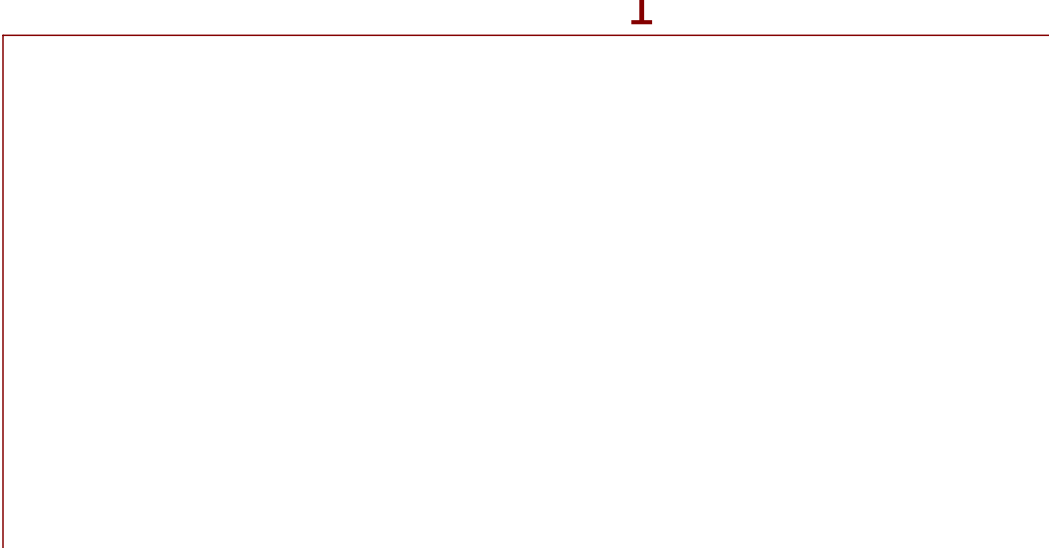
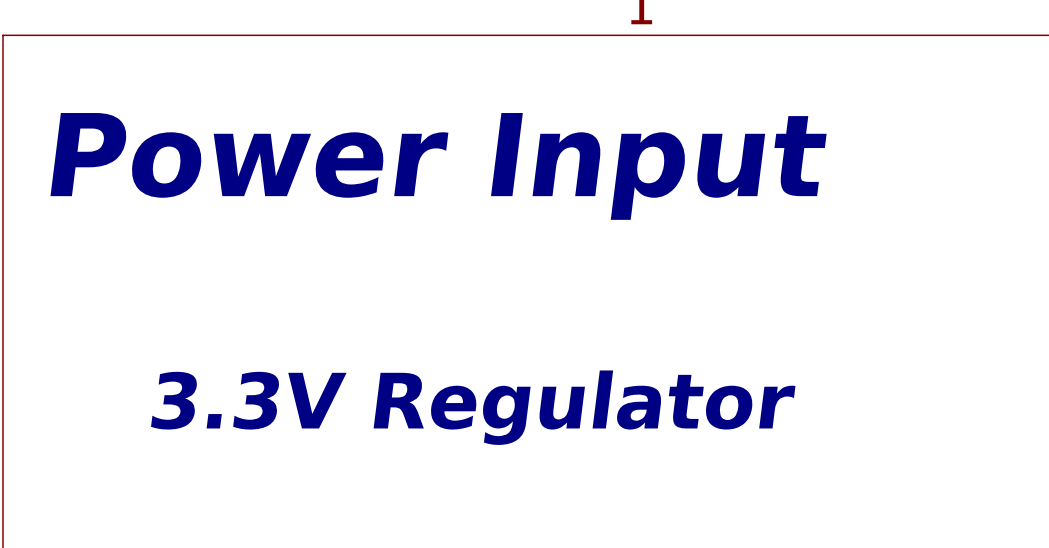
text: none -> Power Input (438, 166)
text: none -> 3.3V Regulator (473, 407)

